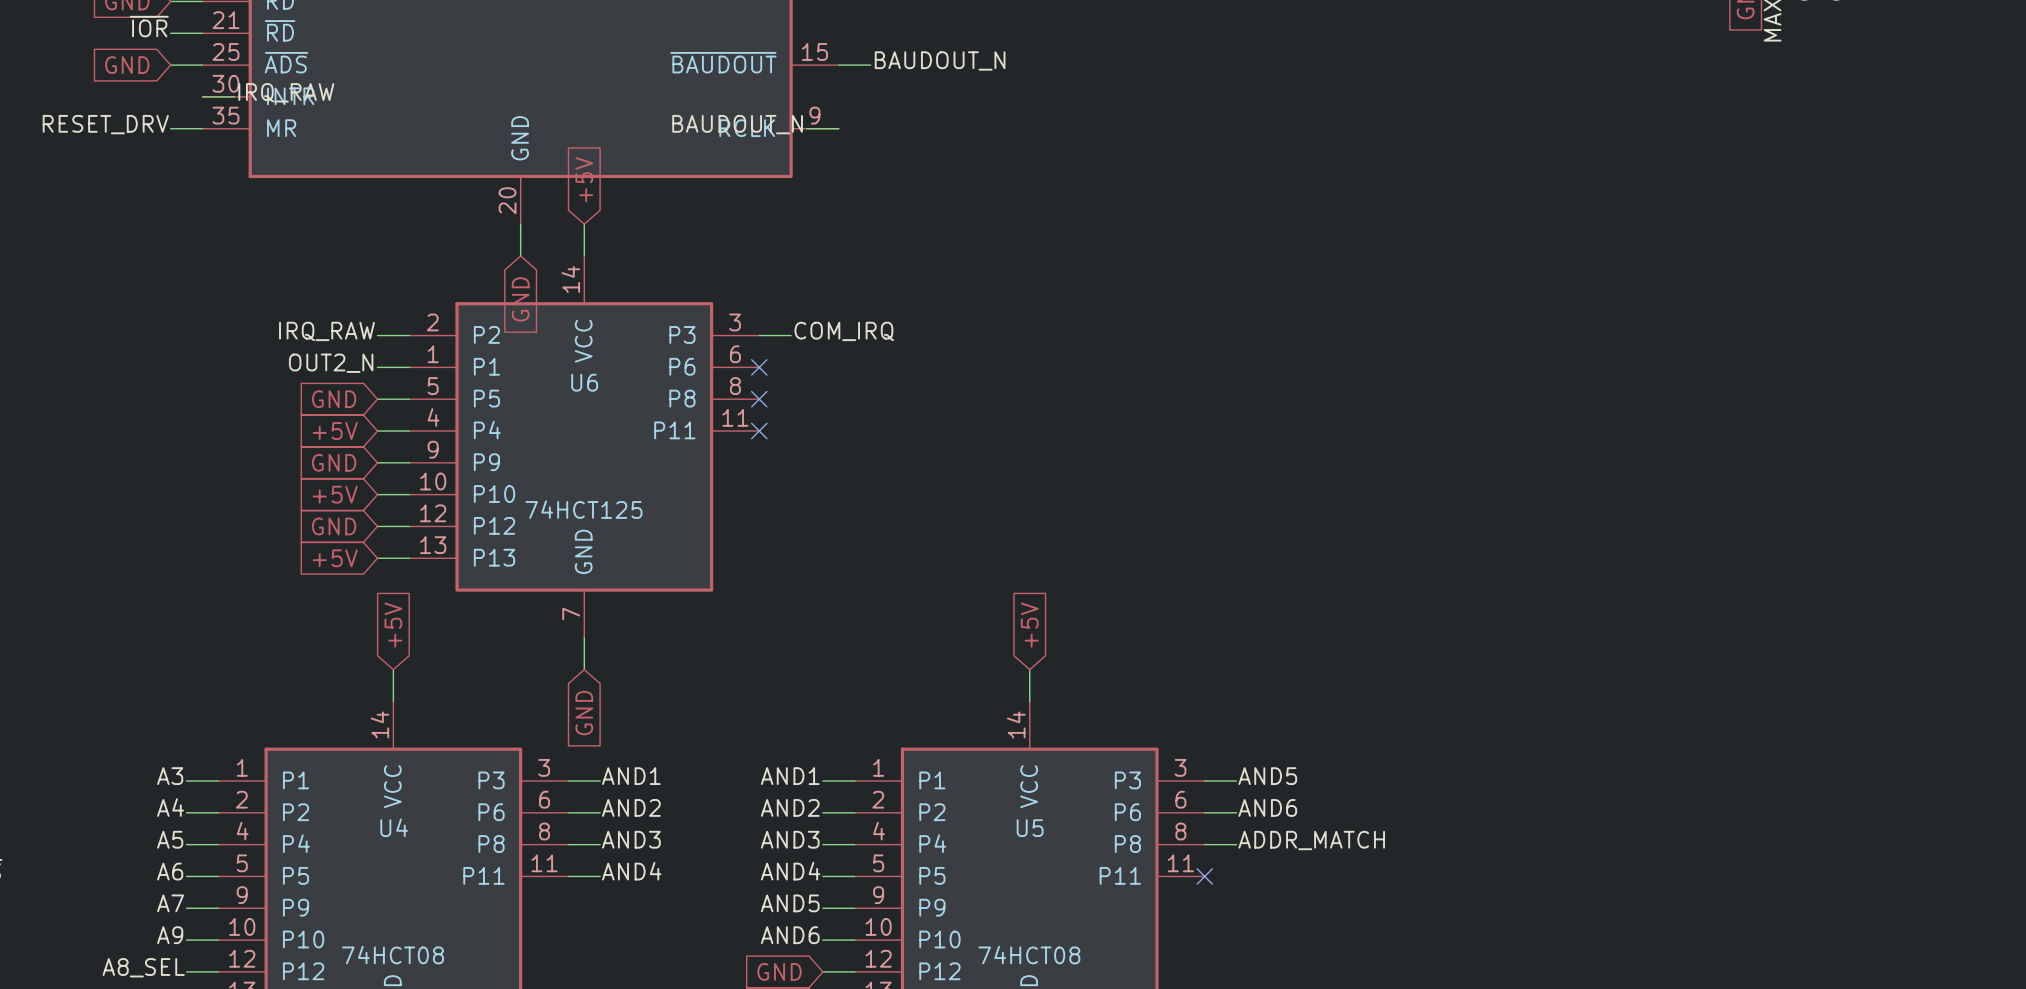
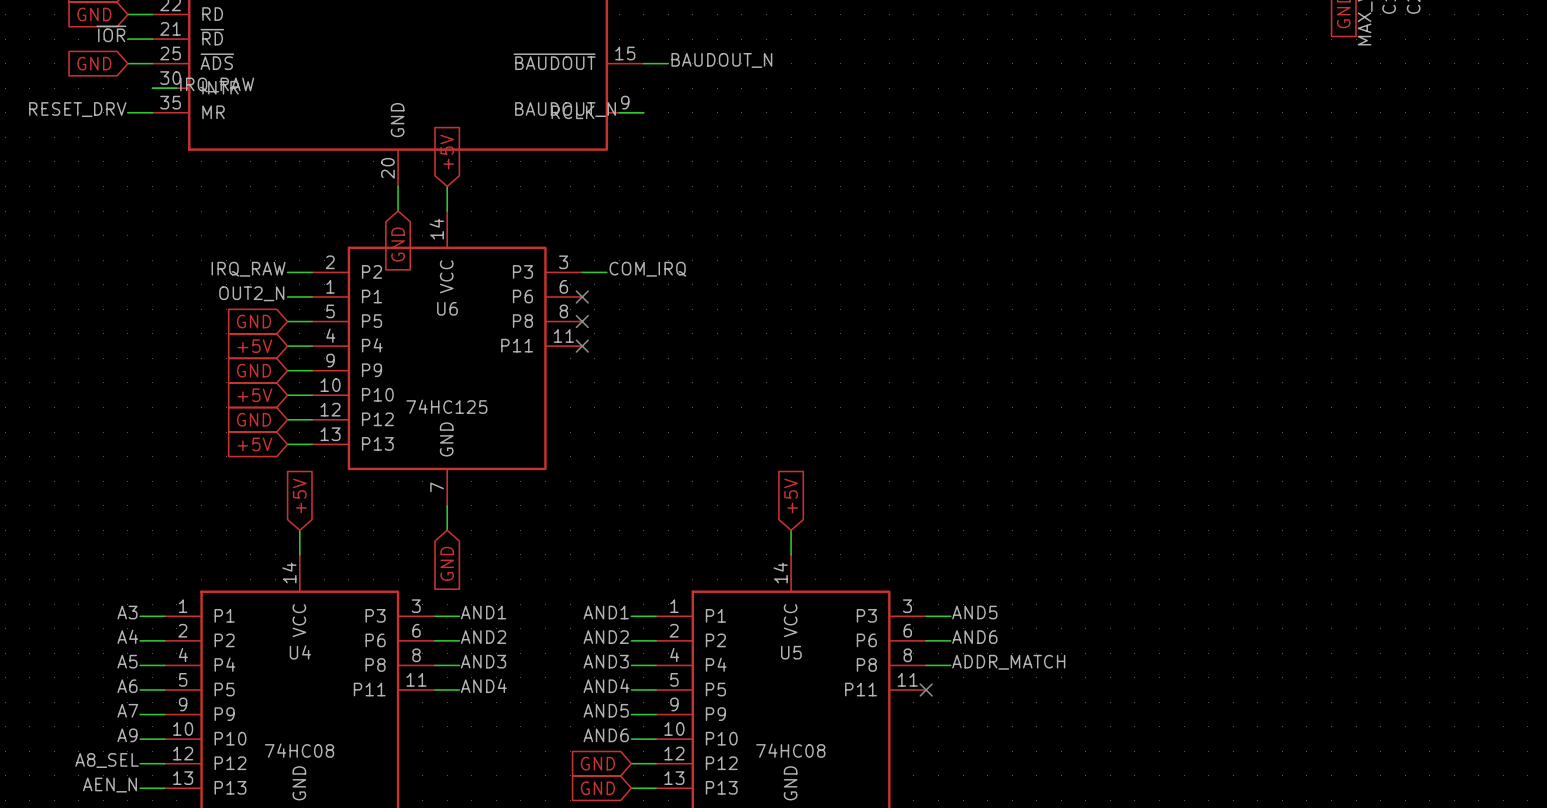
U6 value: 74HCT125 (583, 509) -> 74HC125 (446, 406)
U4 value: 74HCT08 (393, 955) -> 74HC08 (299, 750)
U5 value: 74HCT08 (1029, 955) -> 74HC08 (790, 750)

